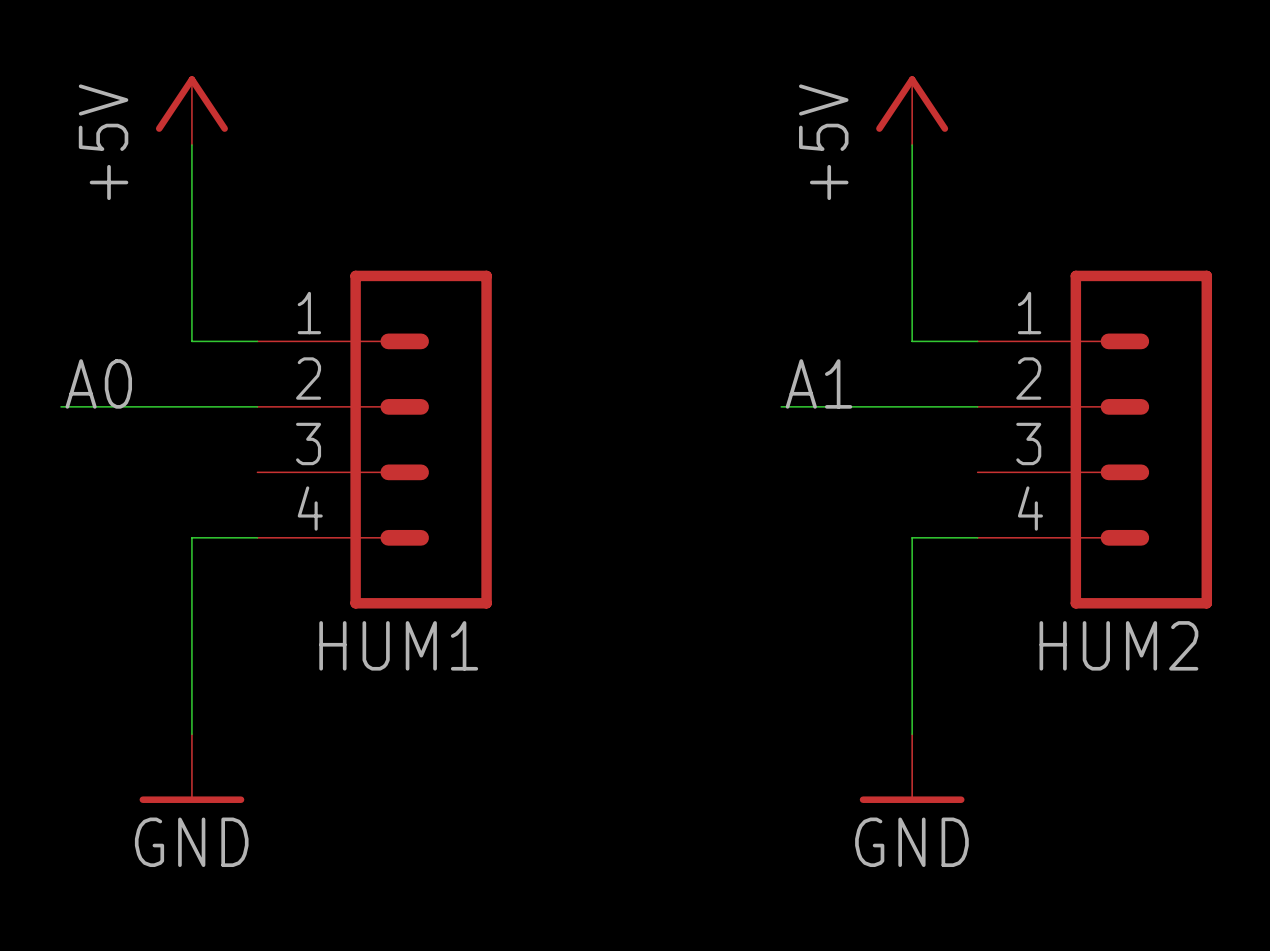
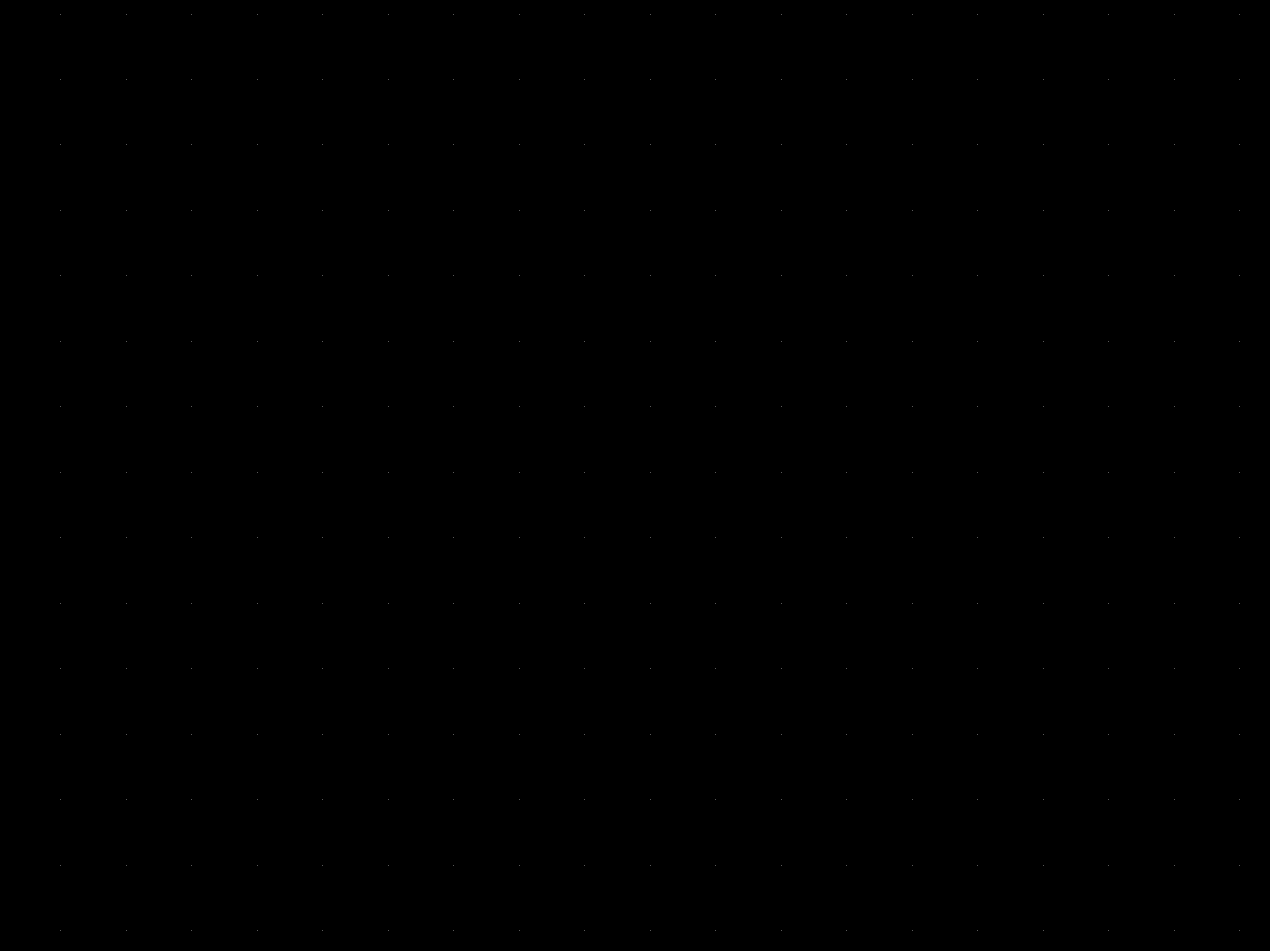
power symbol: +5V (191, 110) -> none
power symbol: +5V (912, 110) -> none
wire: (191, 144) (191, 341) (257, 341) -> none
wire: (912, 144) (912, 341) (977, 341) -> none
label: A0 (98, 383) -> none
label: A1 (818, 383) -> none
wire: (60, 406) (257, 406) -> none
wire: (781, 406) (977, 406) -> none
HUM1: (374, 439) -> none
HUM2: (1094, 439) -> none
wire: (257, 537) (191, 537) (191, 734) -> none
wire: (977, 537) (912, 537) (912, 734) -> none
power symbol: GND (191, 768) -> none
power symbol: GND (912, 768) -> none

